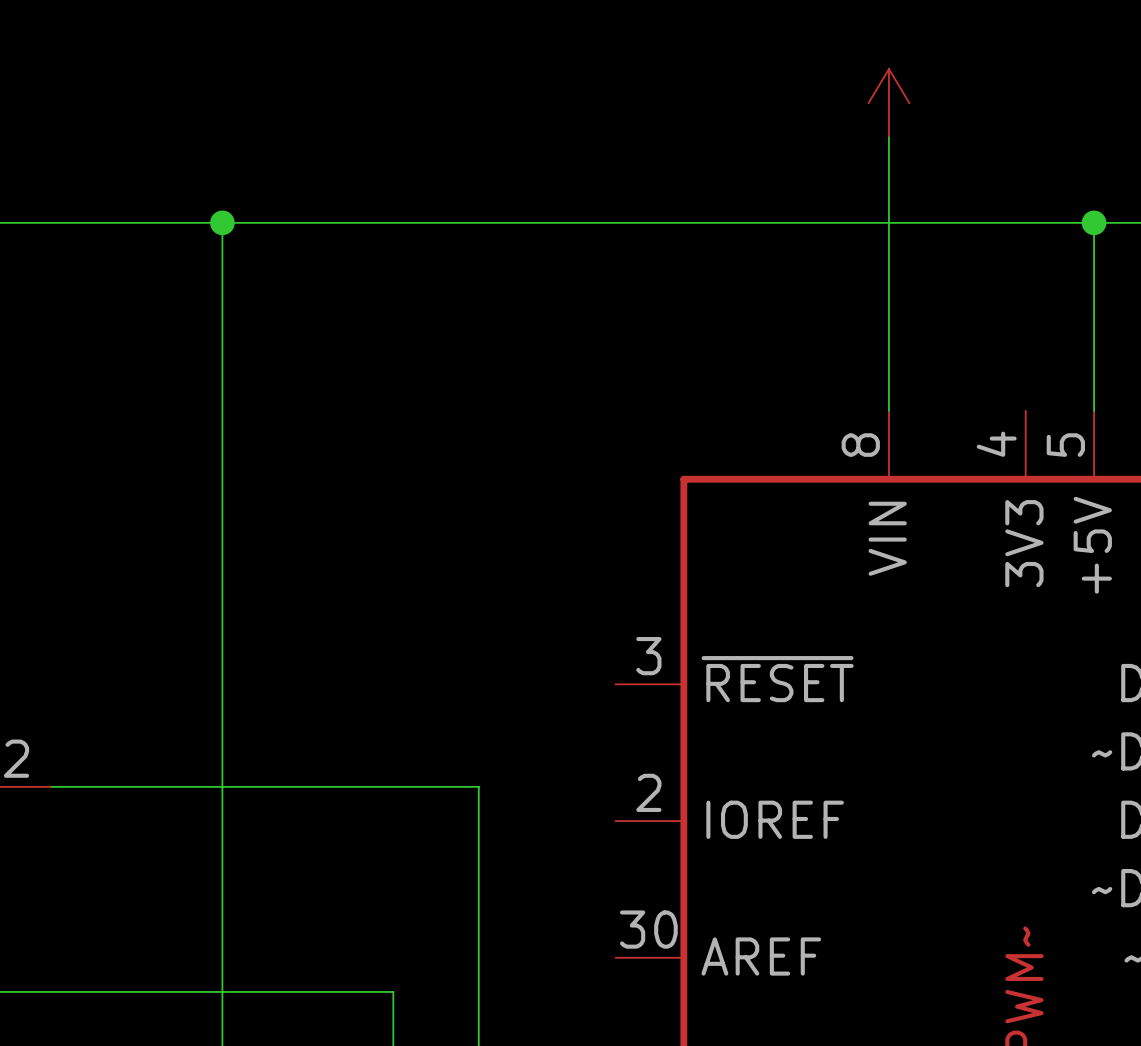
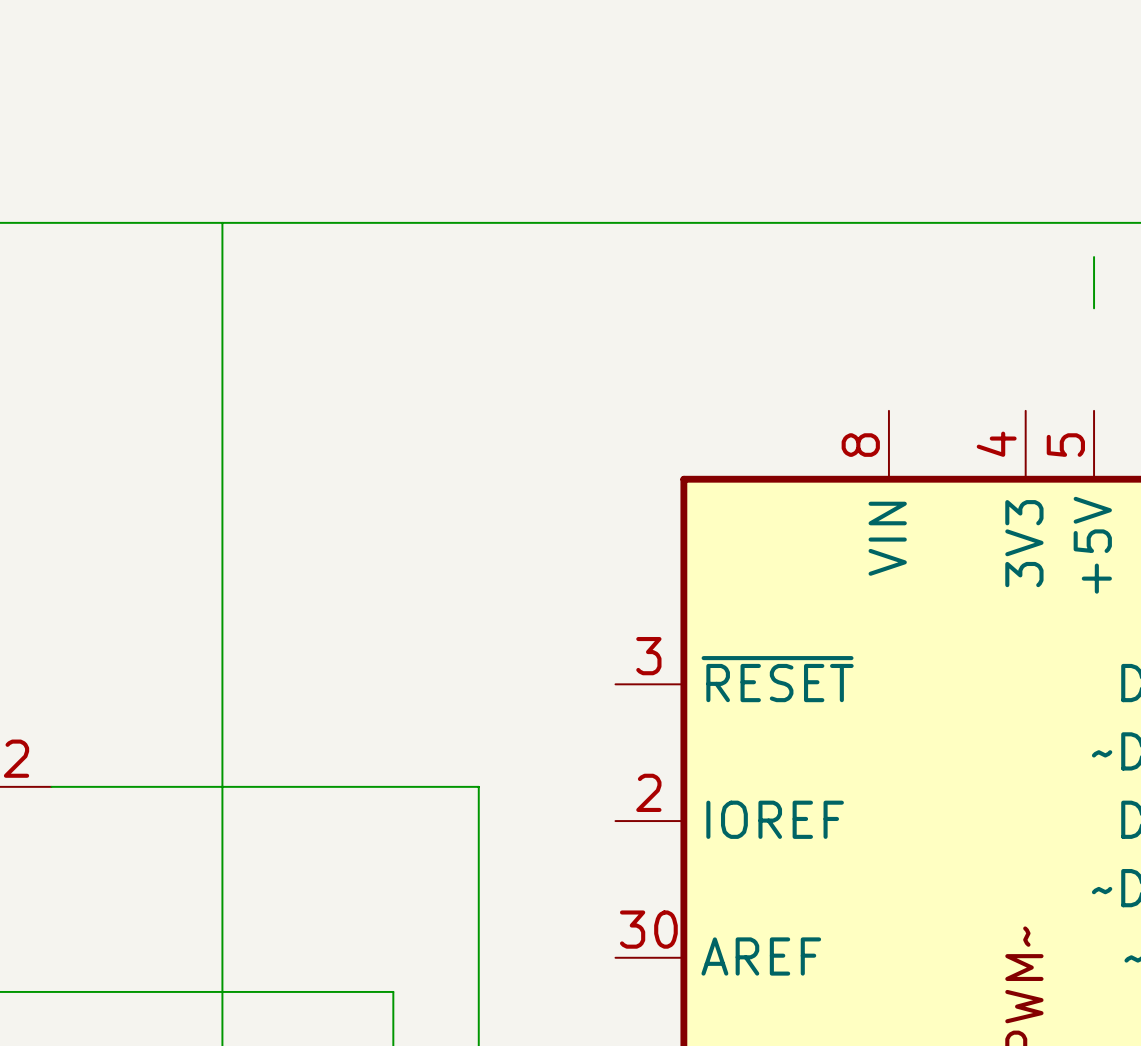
power symbol: (888, 103) -> none
wire: (888, 137) (888, 410) -> none
junction: (222, 222) -> none
wire: (1094, 222) (1094, 257) -> none
junction: (1094, 222) -> none
wire: (1094, 308) (1094, 410) -> none

